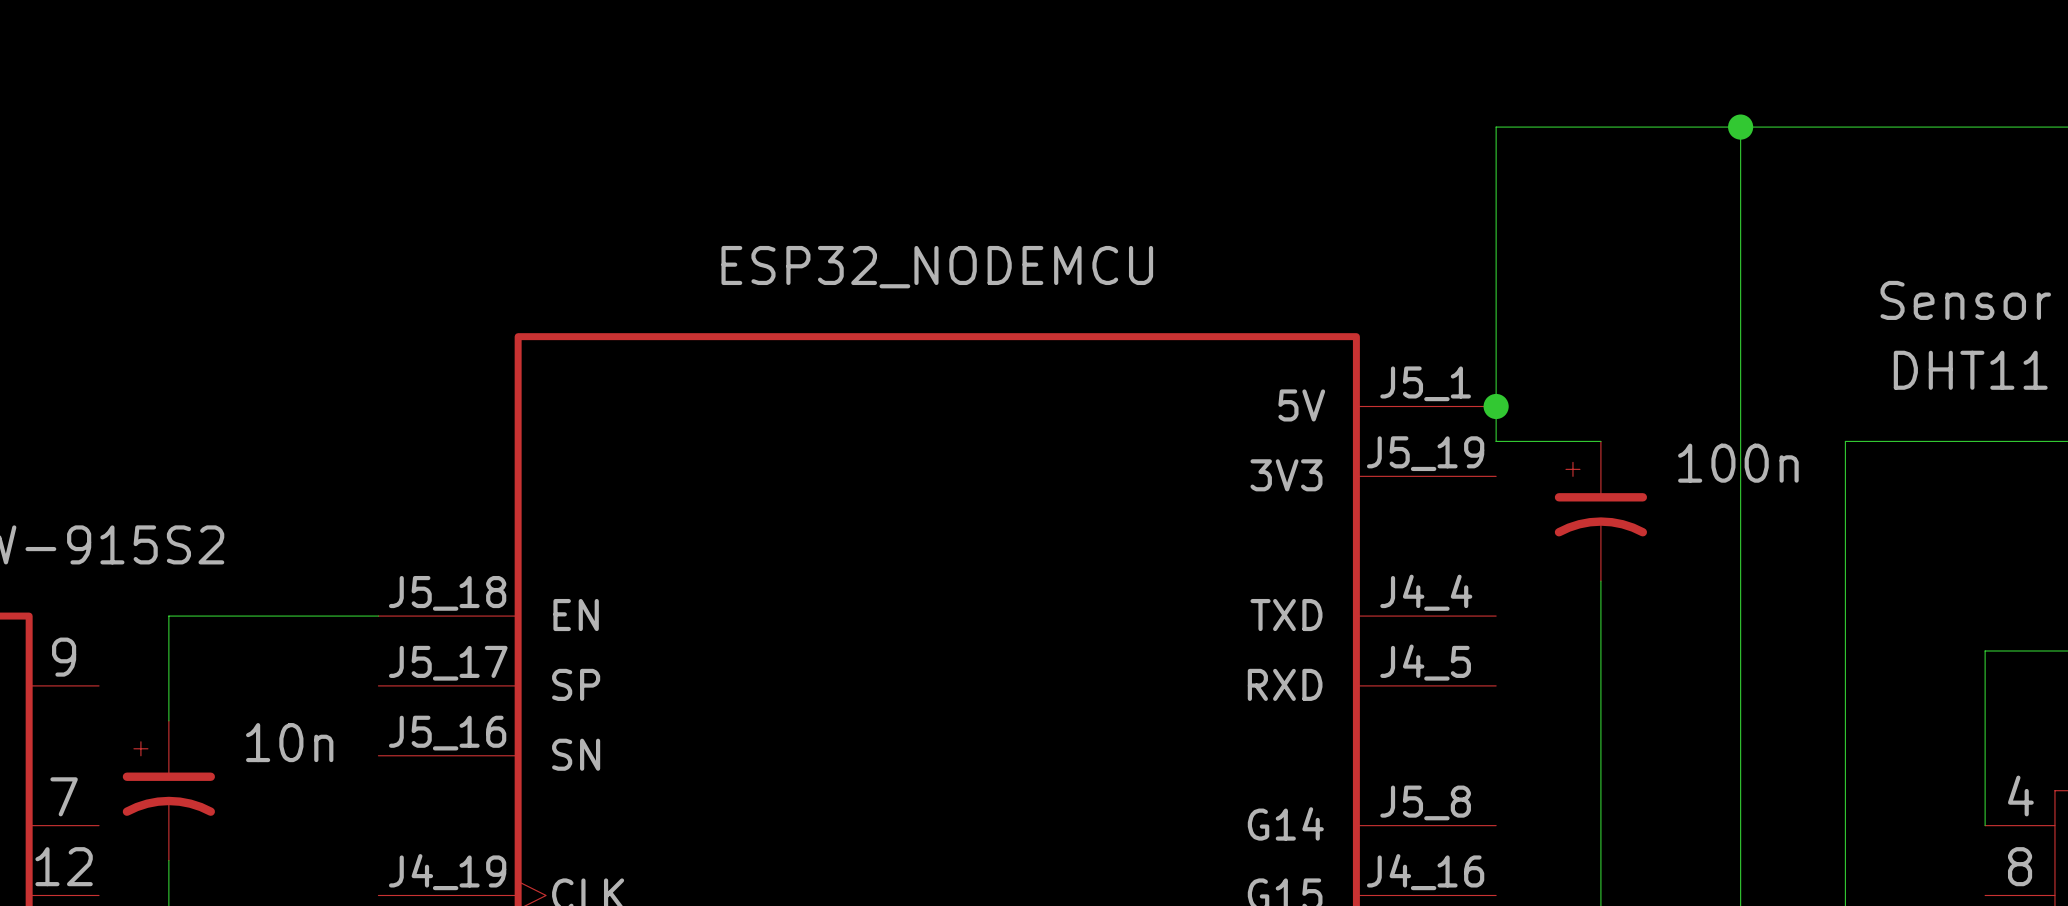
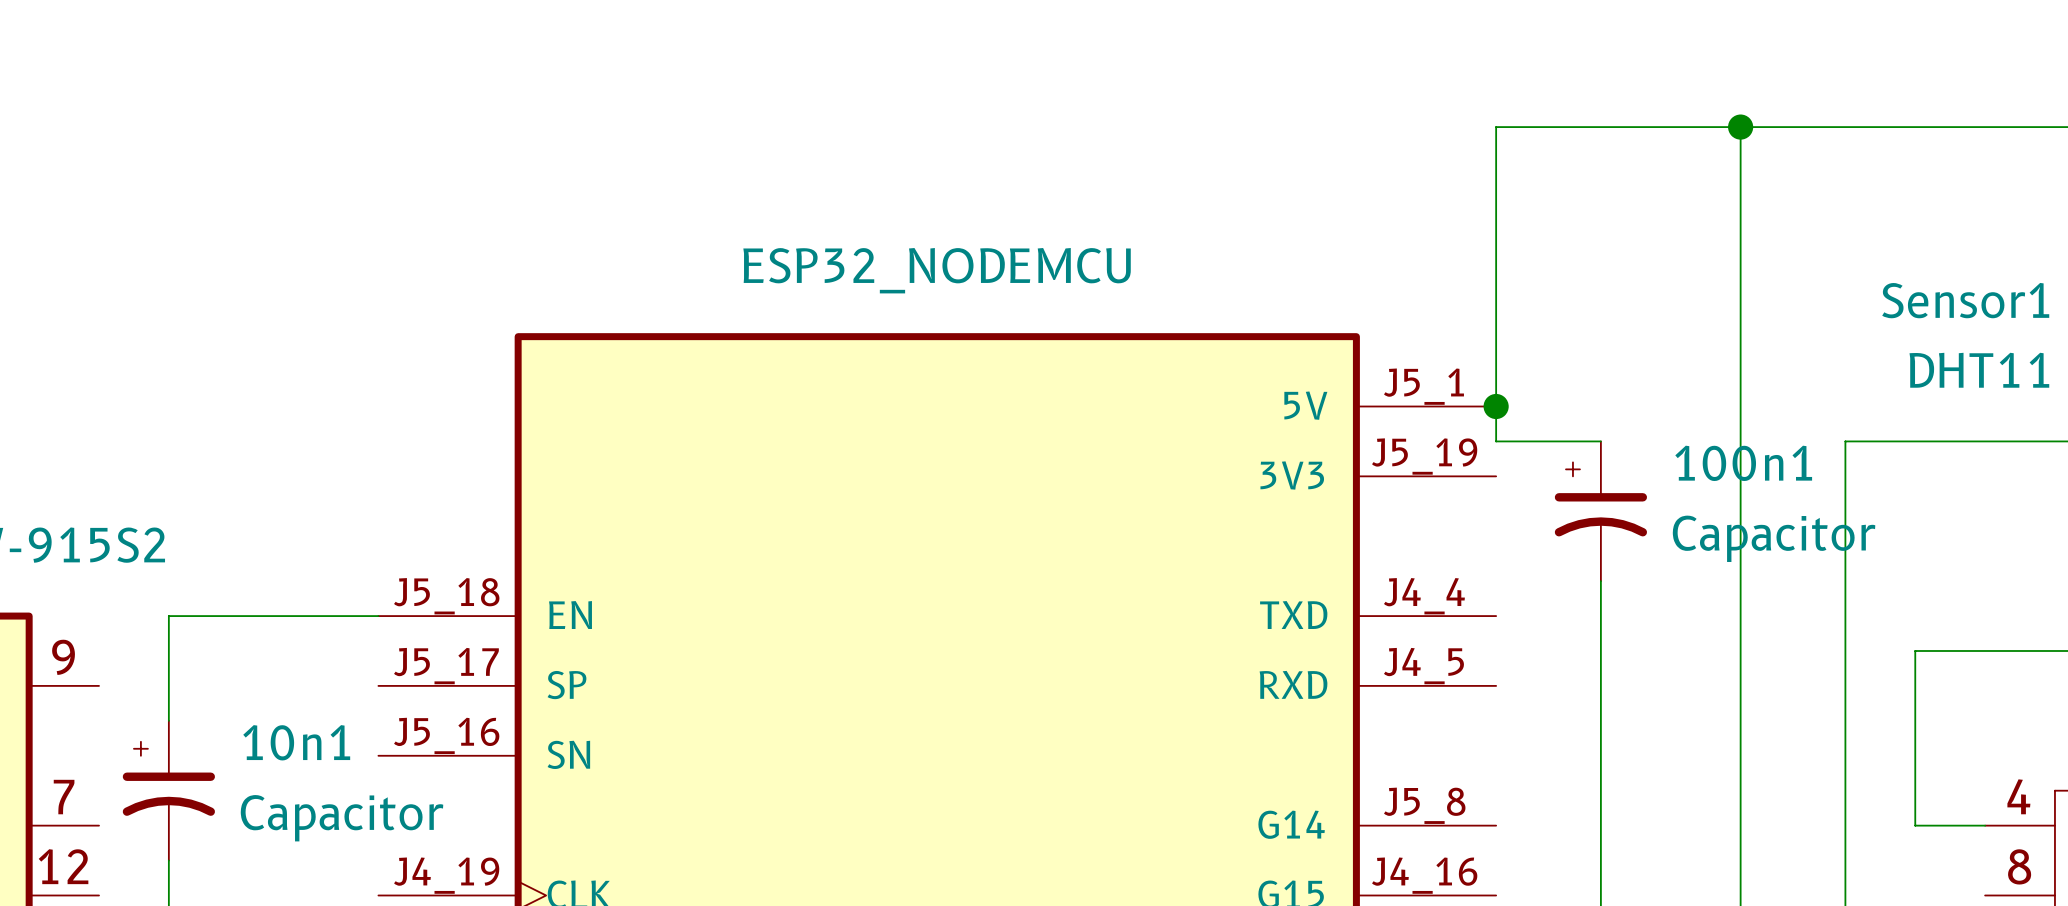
Sensor name: Sensor (1965, 300) -> Sensor1 (1965, 300)
100n name: 100n (1738, 463) -> 100n1 (1743, 463)
100n value: none -> Capacitor (1774, 538)
wire: (1985, 650) (1985, 825) -> (1985, 650) (1915, 650) (1915, 825) (1985, 825)
10n name: 10n (289, 742) -> 10n1 (296, 742)
10n value: none -> Capacitor (342, 818)

